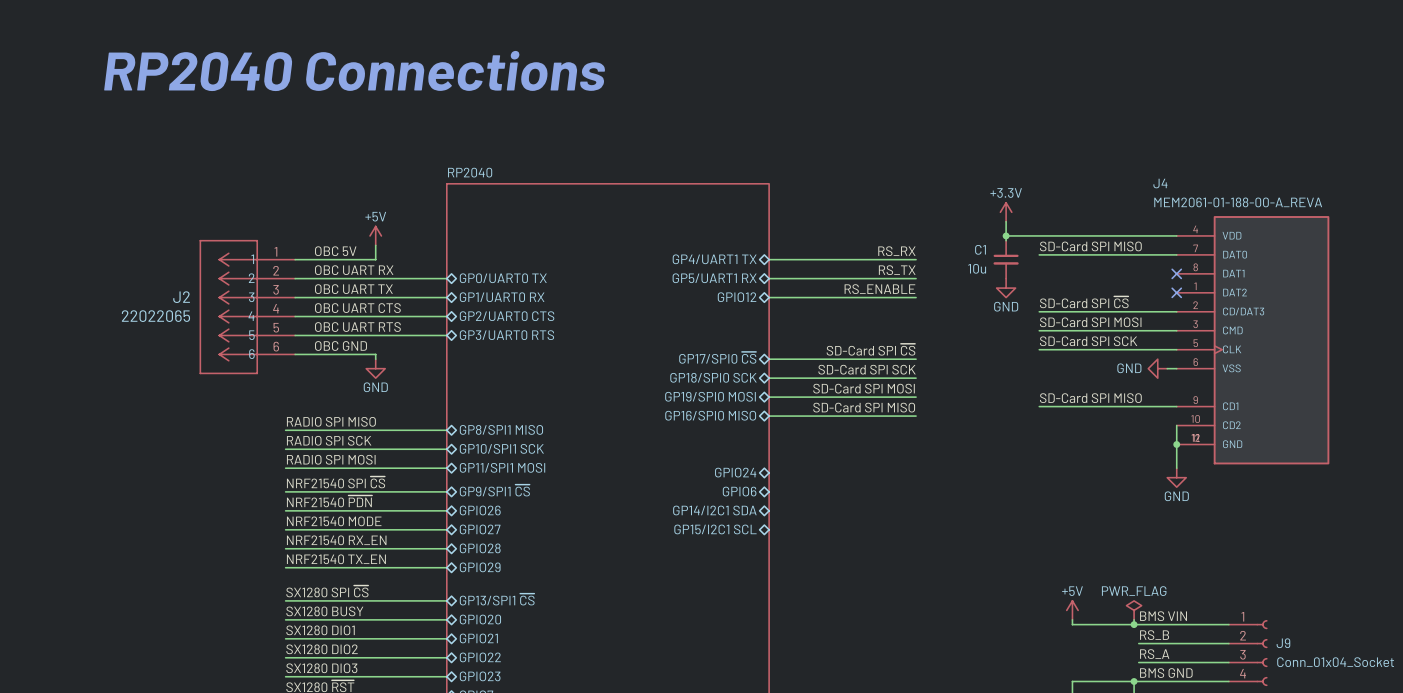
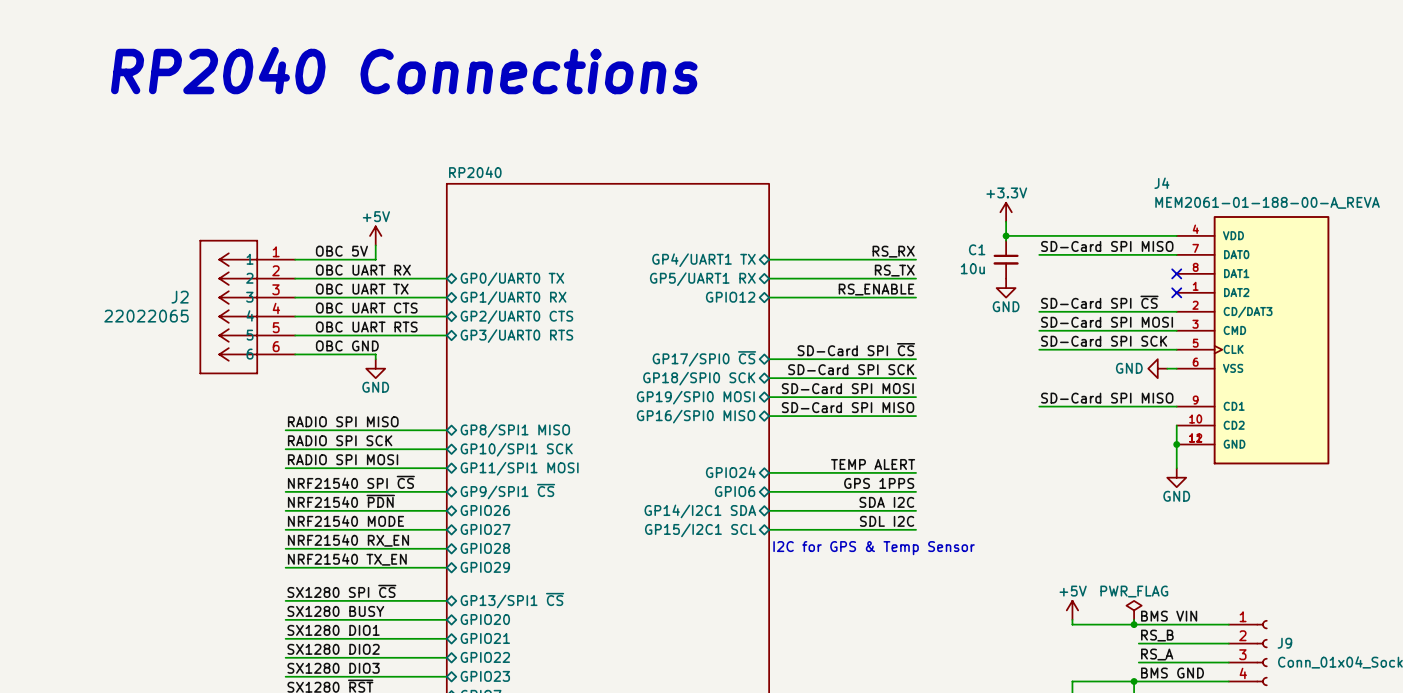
label: none -> TEMP ALERT (873, 464)
wire: none -> (769, 472) (916, 472)
label: none -> GPS 1PPS (879, 483)
wire: none -> (769, 491) (916, 491)
label: none -> SDA I2C (886, 502)
wire: none -> (769, 510) (916, 510)
label: none -> SDL I2C (887, 521)
wire: none -> (769, 529) (916, 529)
text: none -> I2C for GPS & Temp Sensor (874, 548)

